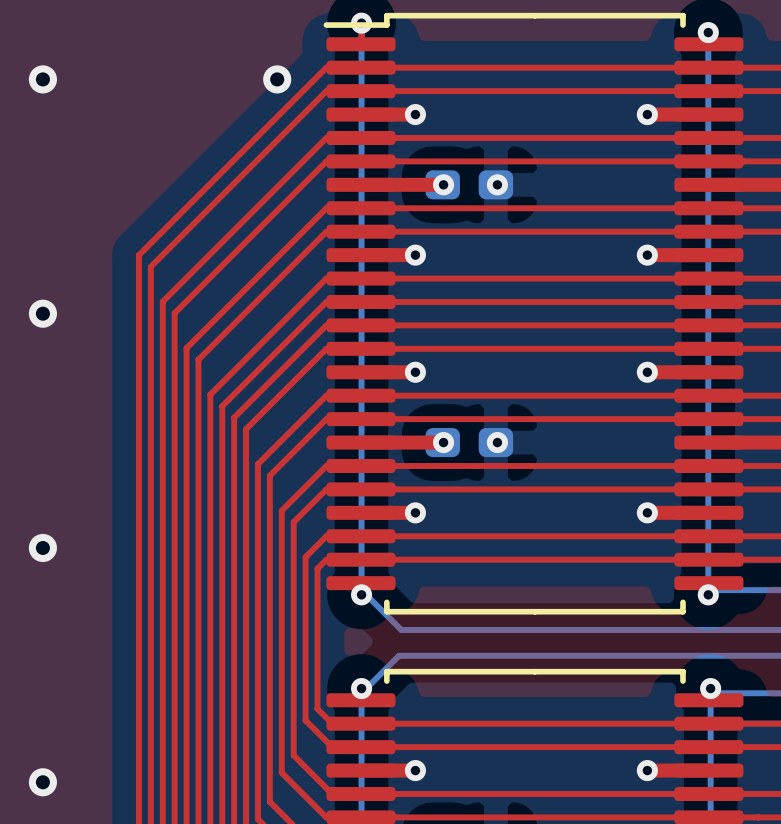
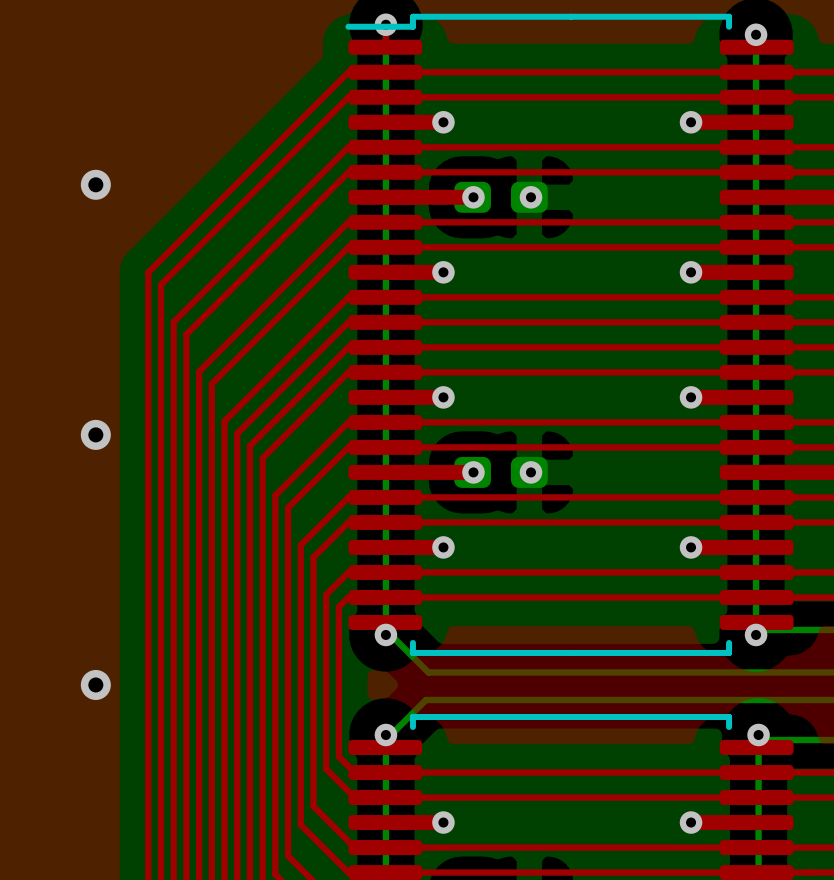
via: (42, 79) -> none
via: (277, 79) -> none
via: none -> (95, 184)
via: (42, 313) -> none
via: none -> (95, 434)
via: (42, 547) -> none
via: none -> (95, 684)
via: (42, 782) -> none

